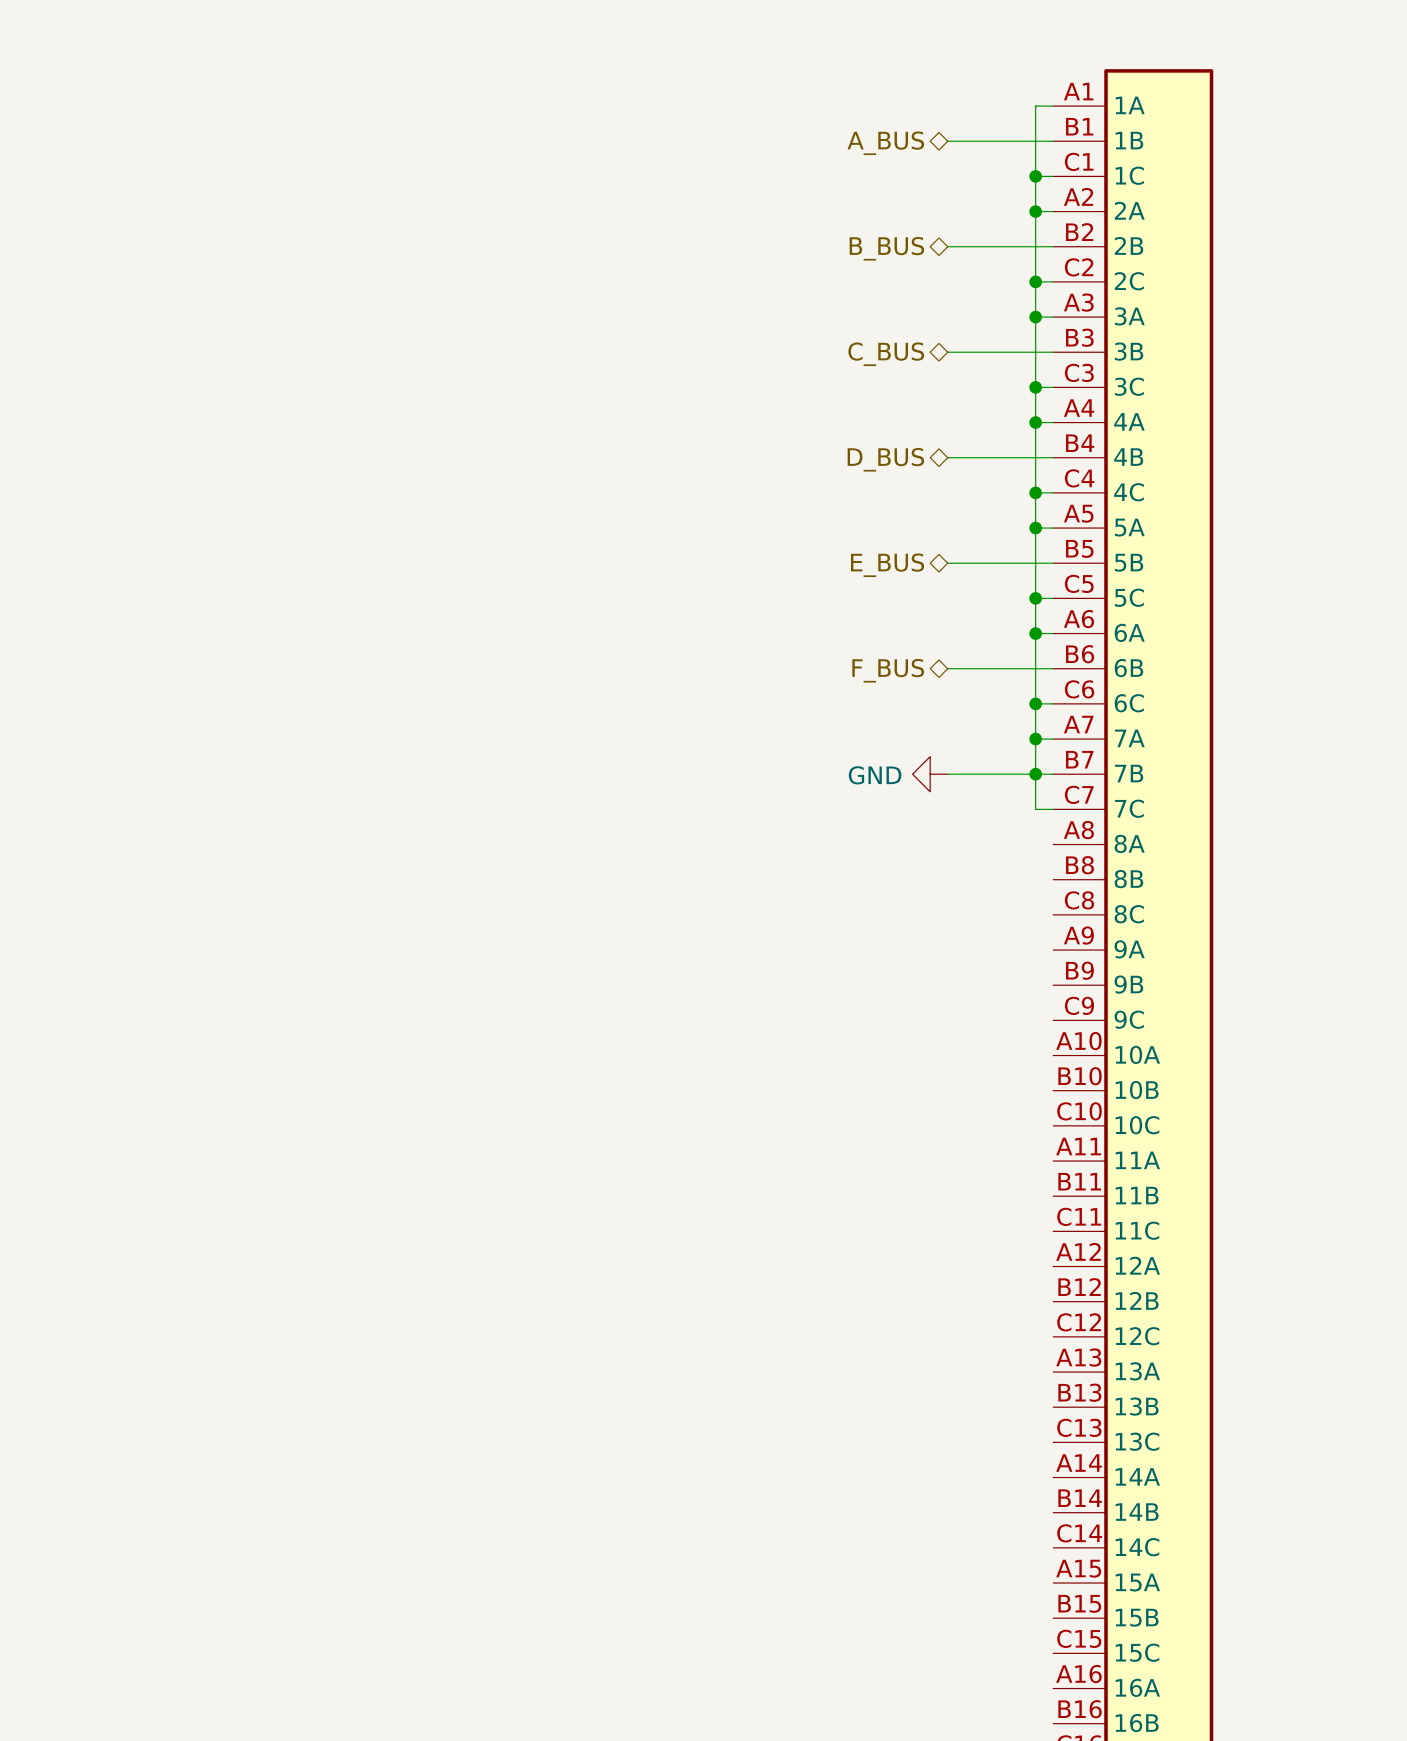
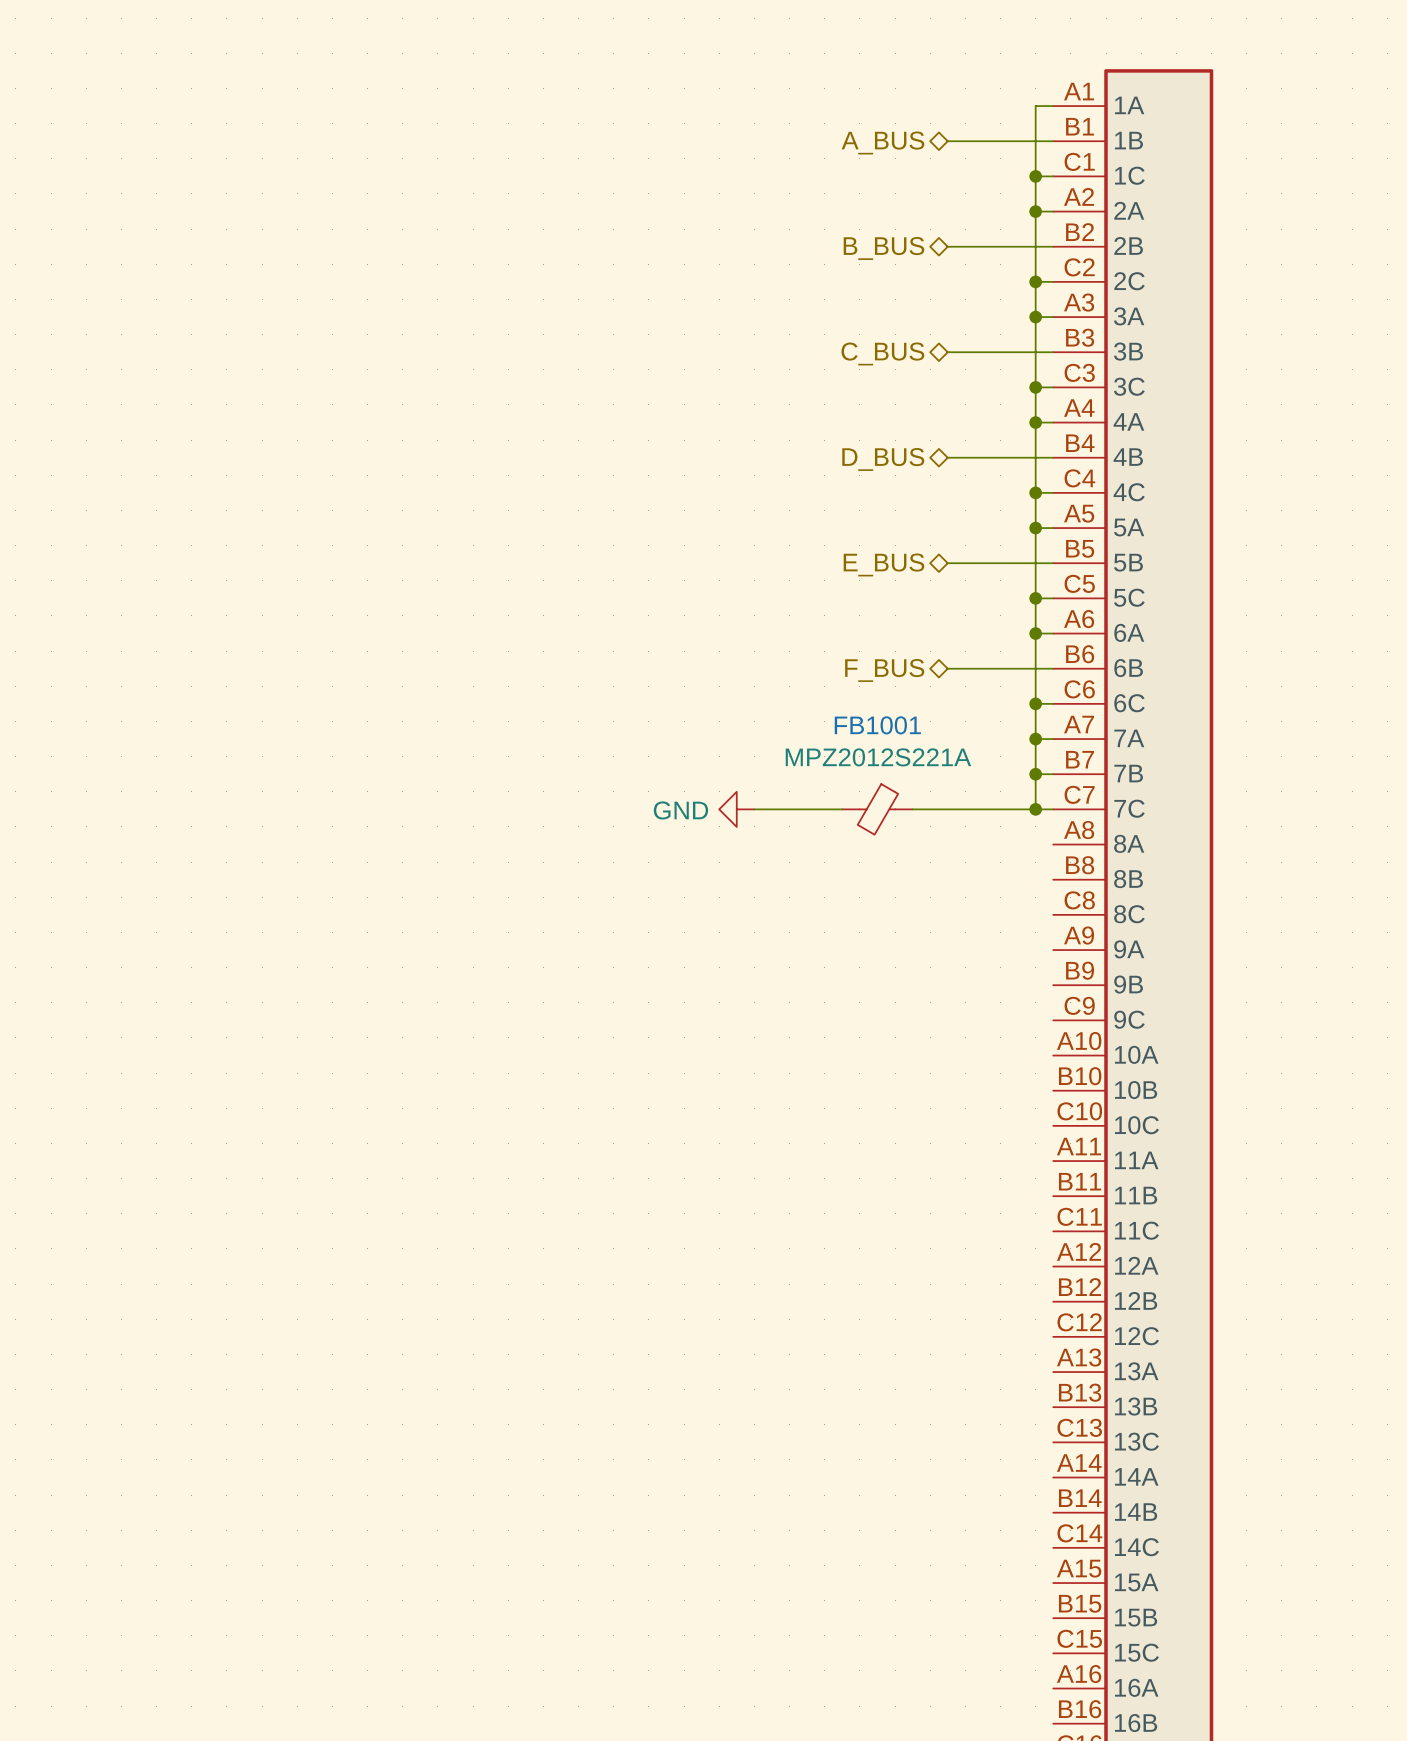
power symbol position: GND (930, 774) -> GND (736, 809)
wire: (947, 774) (1035, 774) -> (754, 809) (842, 809)
FB1001: none -> MPZ2012S221A (877, 809)
wire: none -> (912, 809) (1035, 809)
junction: none -> (1035, 809)

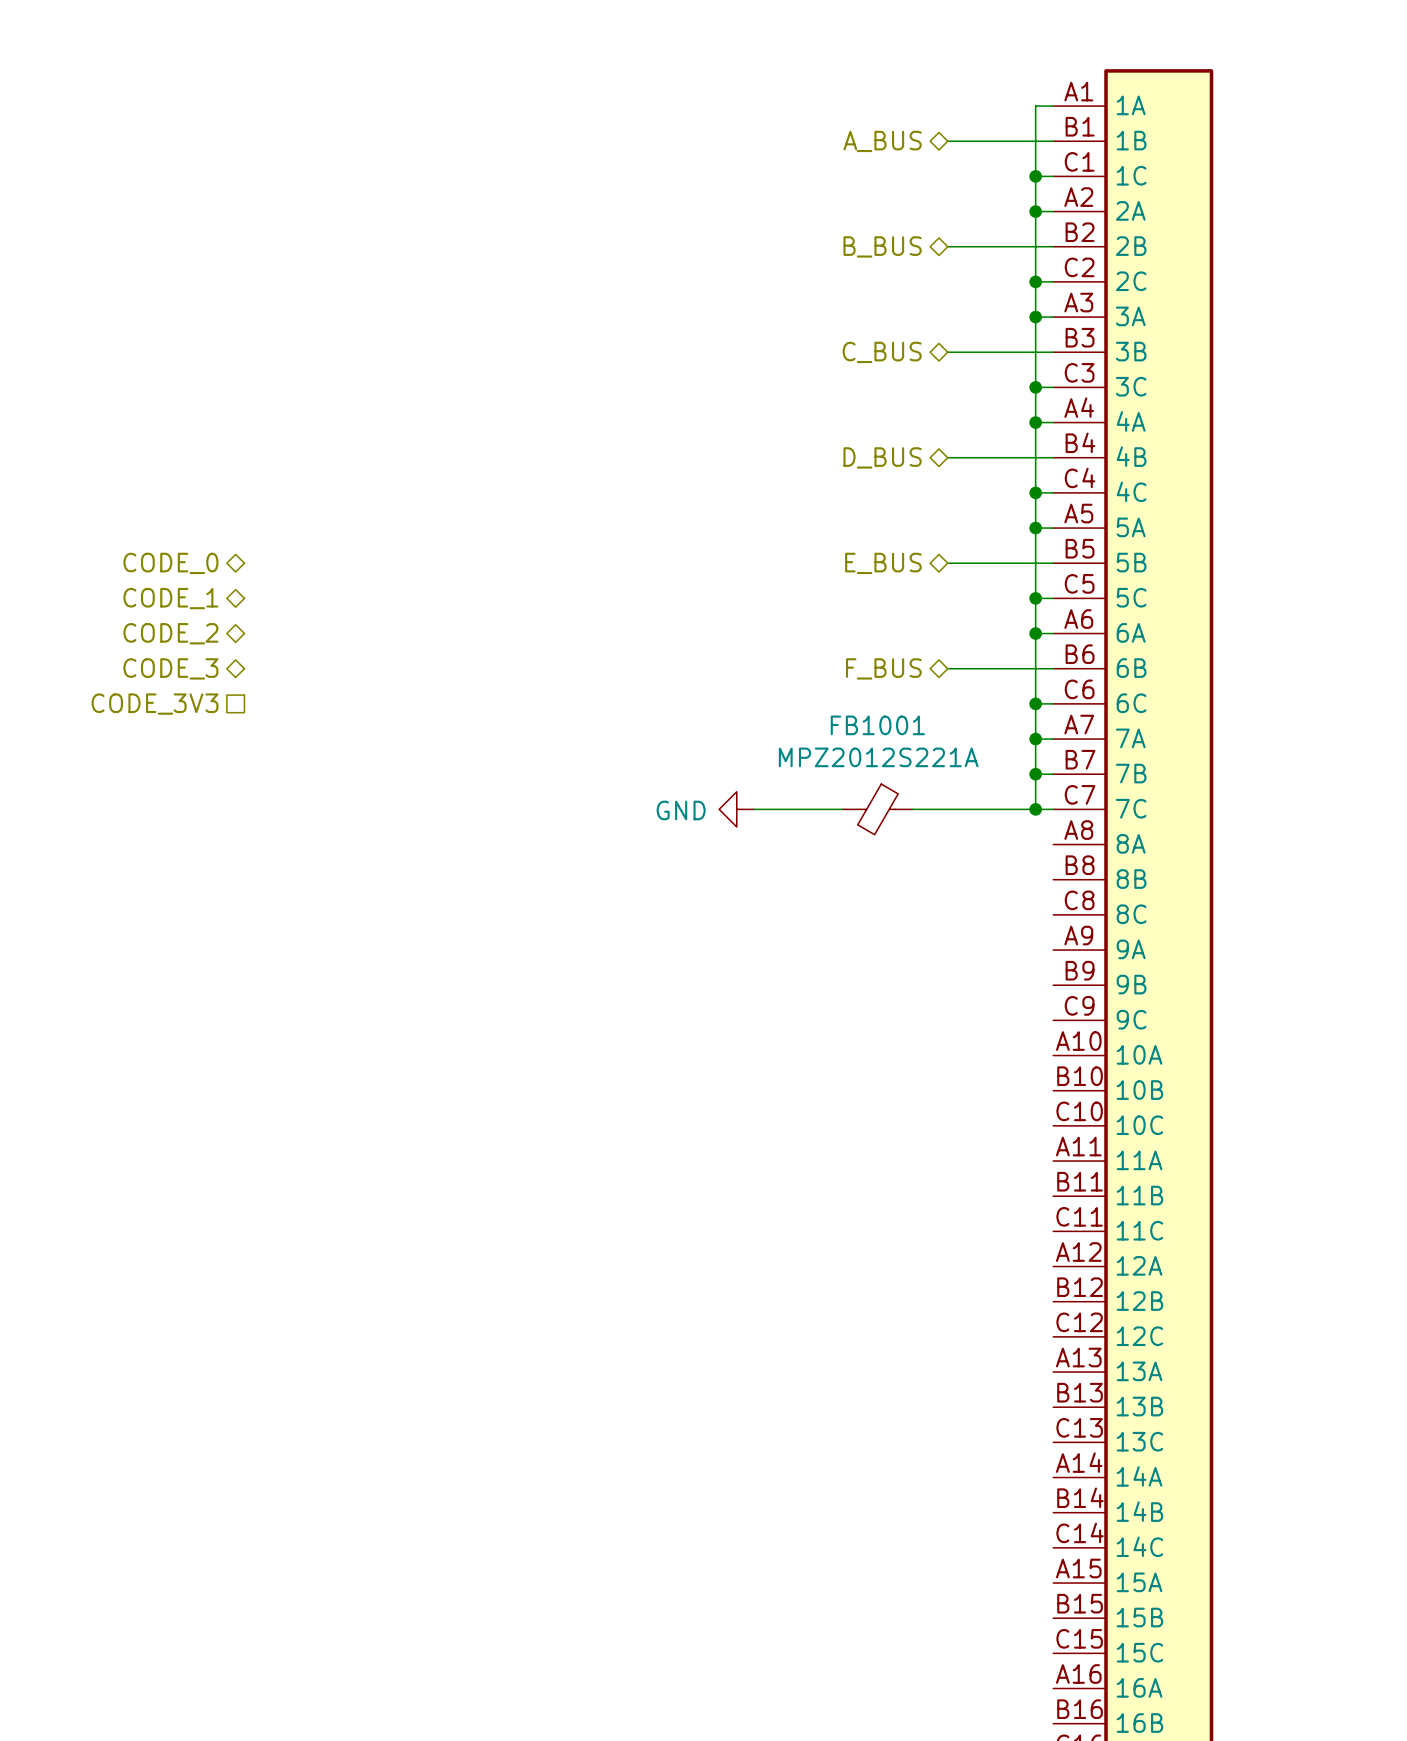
hierarchical label: none -> CODE_0 (170, 563)
hierarchical label: none -> CODE_1 (170, 598)
hierarchical label: none -> CODE_2 (170, 633)
hierarchical label: none -> CODE_3 (170, 668)
hierarchical label: none -> CODE_3V3 (155, 704)

